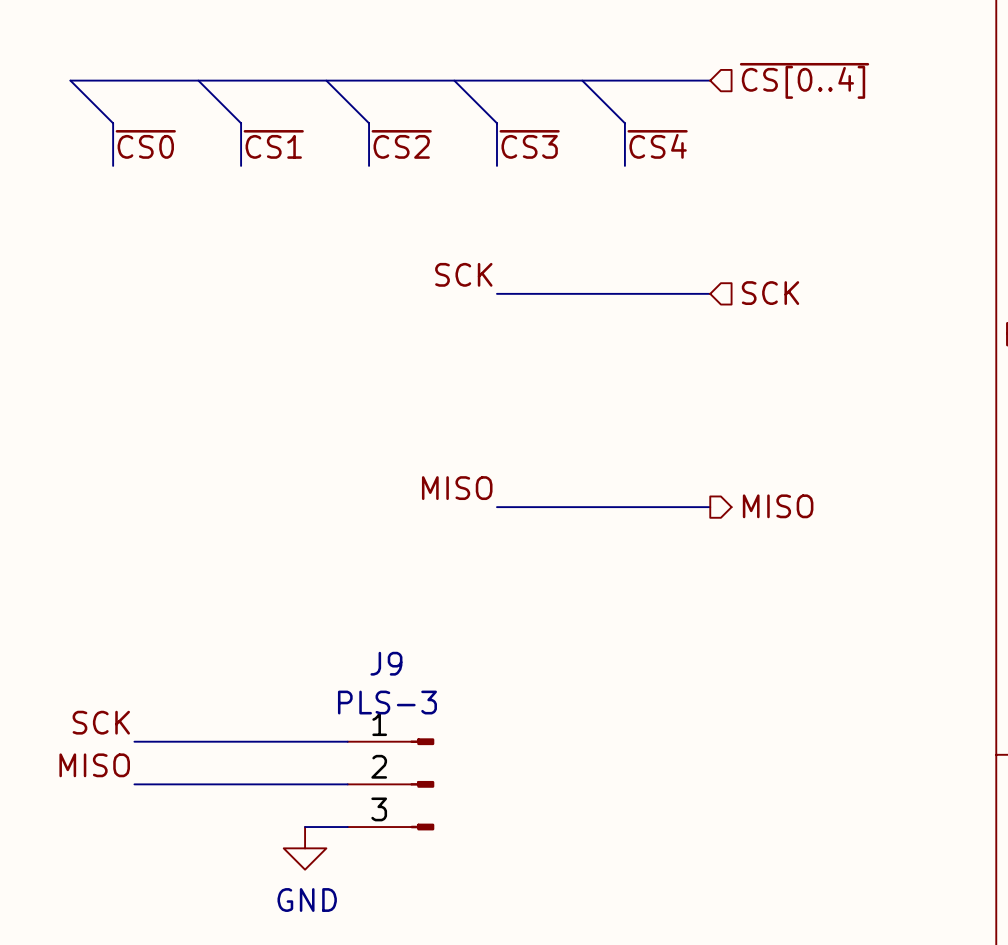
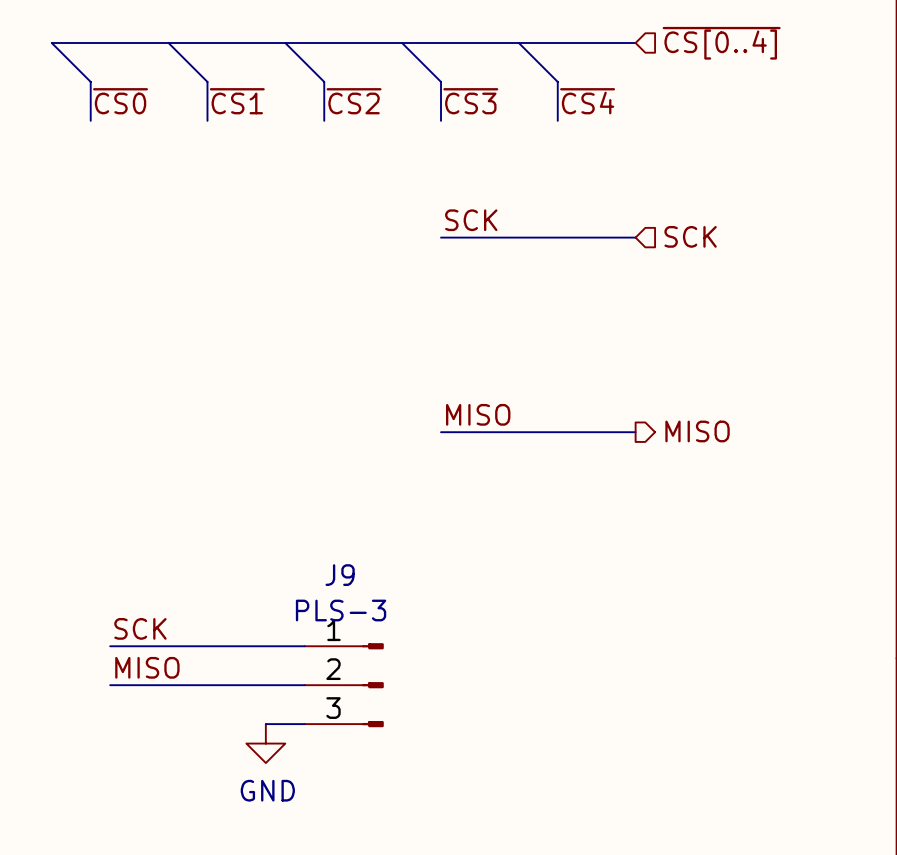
label position: SCK (463, 274) -> SCK (471, 220)
label position: MISO (457, 488) -> MISO (478, 414)
label position: SCK (101, 722) -> SCK (140, 628)
label position: MISO (94, 765) -> MISO (147, 667)

